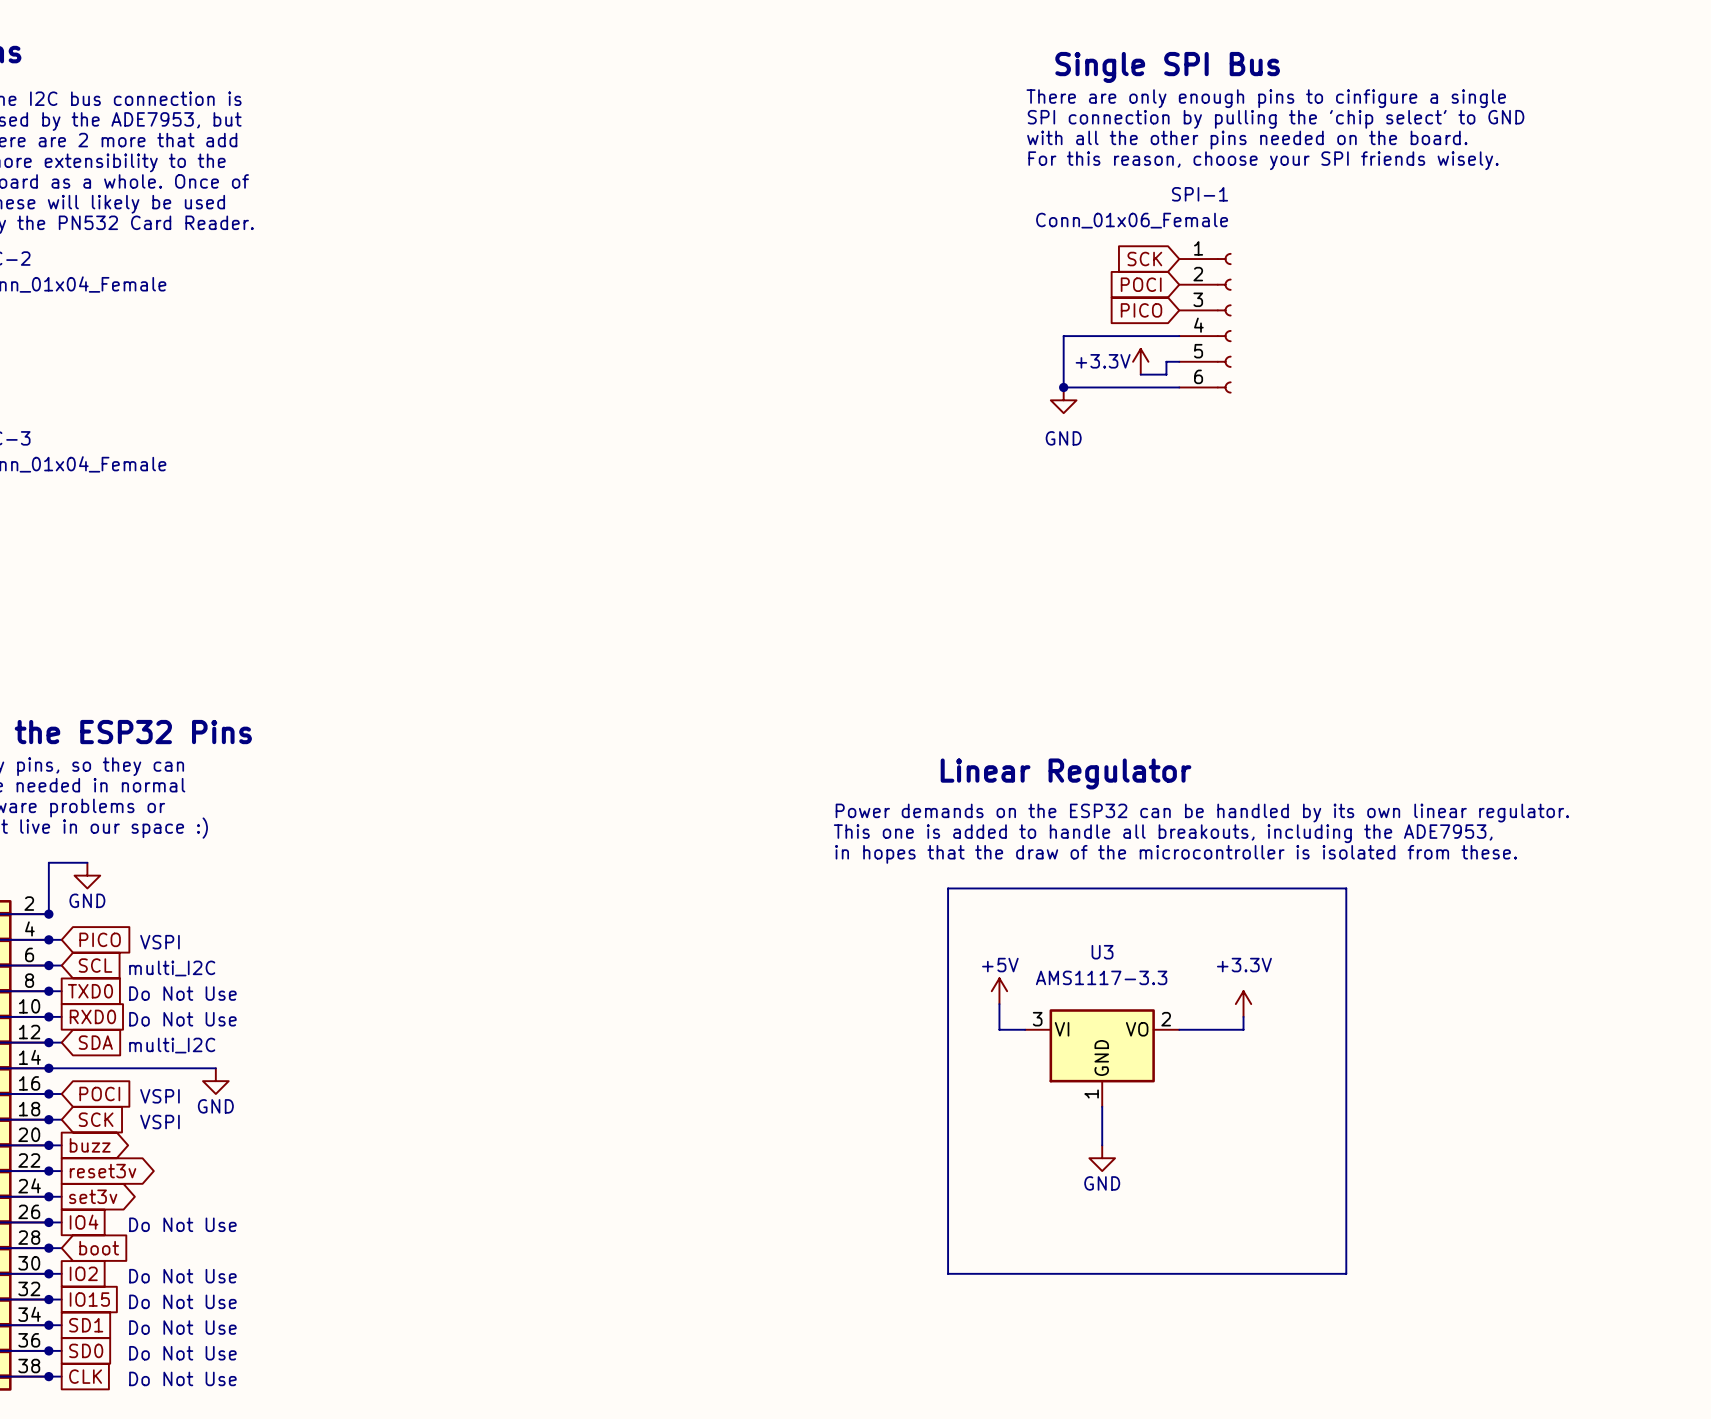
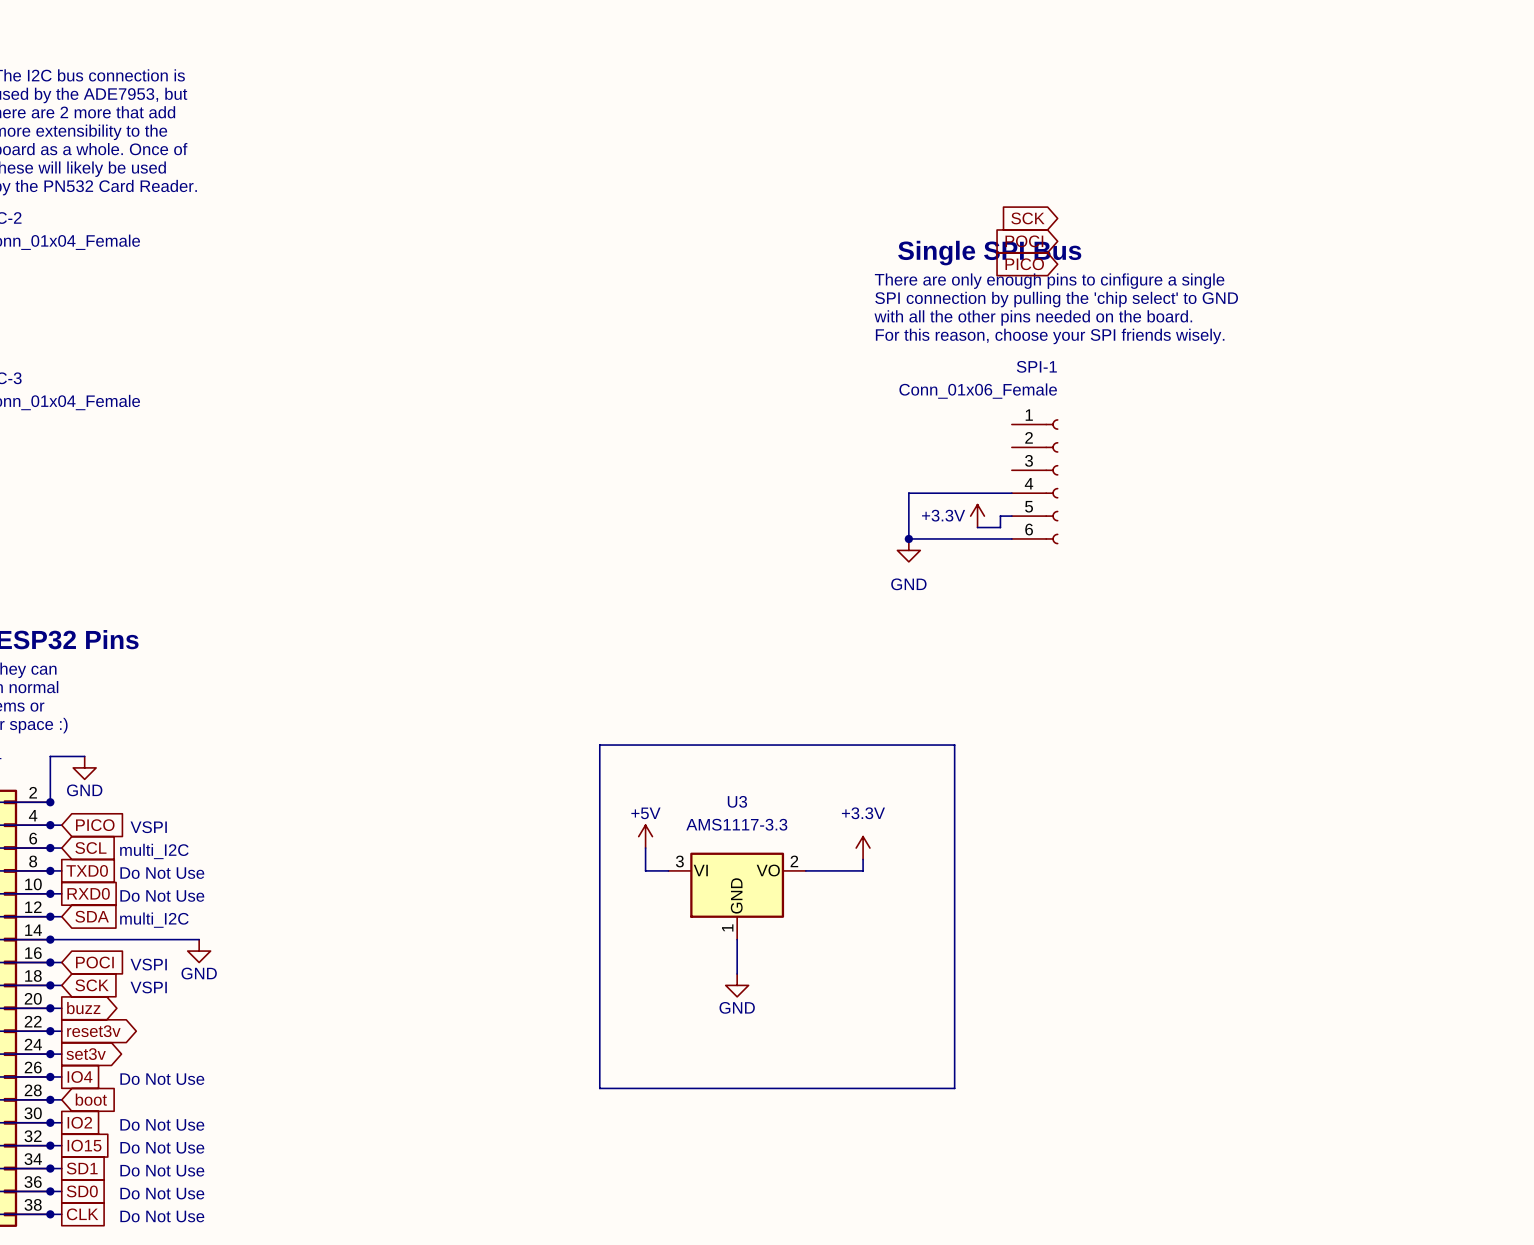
text position: Single SPI Bus (1167, 67) -> Single SPI Bus (989, 253)
text position: There are only enough pins to cinfigure a single (1266, 98) -> There are only enough pins to cinfigure a single (1049, 281)
text position: SPI connection by pulling the 'chip select' to GND (1276, 119) -> SPI connection by pulling the 'chip select' to GND (1056, 299)
text position: with all the other pins needed on the board. (1247, 140) -> with all the other pins needed on the board. (1033, 317)
text position: For this reason, choose your SPI friends wisely. (1263, 160) -> For this reason, choose your SPI friends wisely. (1050, 336)
SPI-1 position: (1205, 323) -> (1035, 481)
wire: (1179, 336) (1063, 336) (1063, 387) (1179, 387) -> (1011, 493) (908, 493) (908, 538) (1011, 538)
power symbol: +3.3V (1140, 361) -> none
wire: (1179, 361) (1166, 361) (1166, 374) (1140, 374) -> (1011, 516) (1000, 516) (1000, 527) (977, 527)
junction: (1063, 387) -> none
power symbol position: GND (1063, 400) -> GND (908, 550)
power symbol: none -> +3.3V (977, 516)
junction: none -> (908, 538)
text: Linear Regulator (1066, 773) -> none
text: Power demands on the ESP32 can be handled by its own linear regulator. (1202, 813) -> none
text: This one is added to handle all breakouts, including the ADE7953, (1163, 833) -> none
line: none -> (599, 745) (599, 1088) (954, 1088) (954, 745) (599, 745)
text: in hopes that the draw of the microcontroller is isolated from these. (1176, 854) -> none
line: (948, 888) (948, 1273) (1346, 1273) (1346, 888) (948, 888) -> none
power symbol: none -> +5V (645, 836)
wire: none -> (645, 848) (645, 870) (668, 870)
power symbol: none -> +3.3V (863, 848)
wire: none -> (863, 859) (863, 870) (805, 870)
power symbol: +5V (999, 991) -> none
wire: (999, 1004) (999, 1029) (1025, 1029) -> none
power symbol: +3.3V (1243, 1004) -> none
wire: (1243, 1016) (1243, 1029) (1179, 1029) -> none
U3 position: (1102, 1058) -> (737, 896)
wire: none -> (737, 939) (737, 973)
wire: (1102, 1106) (1102, 1145) -> none
power symbol: none -> GND (737, 985)
power symbol: GND (1102, 1158) -> none

